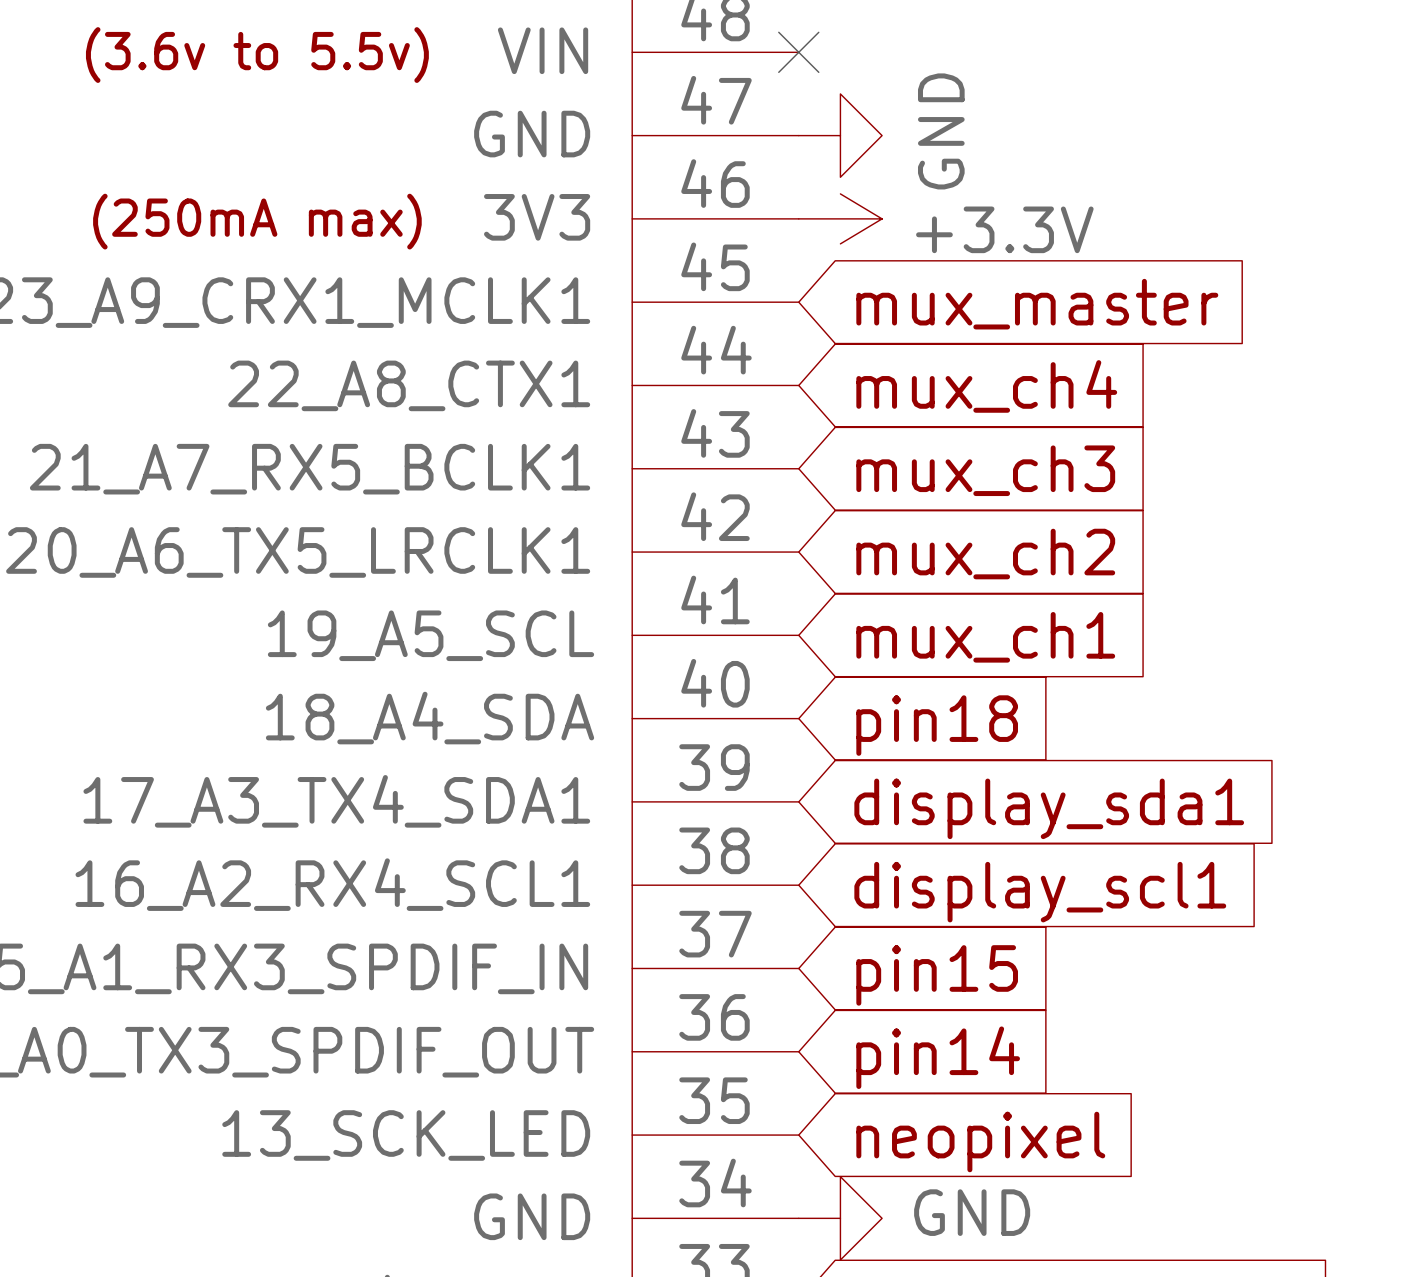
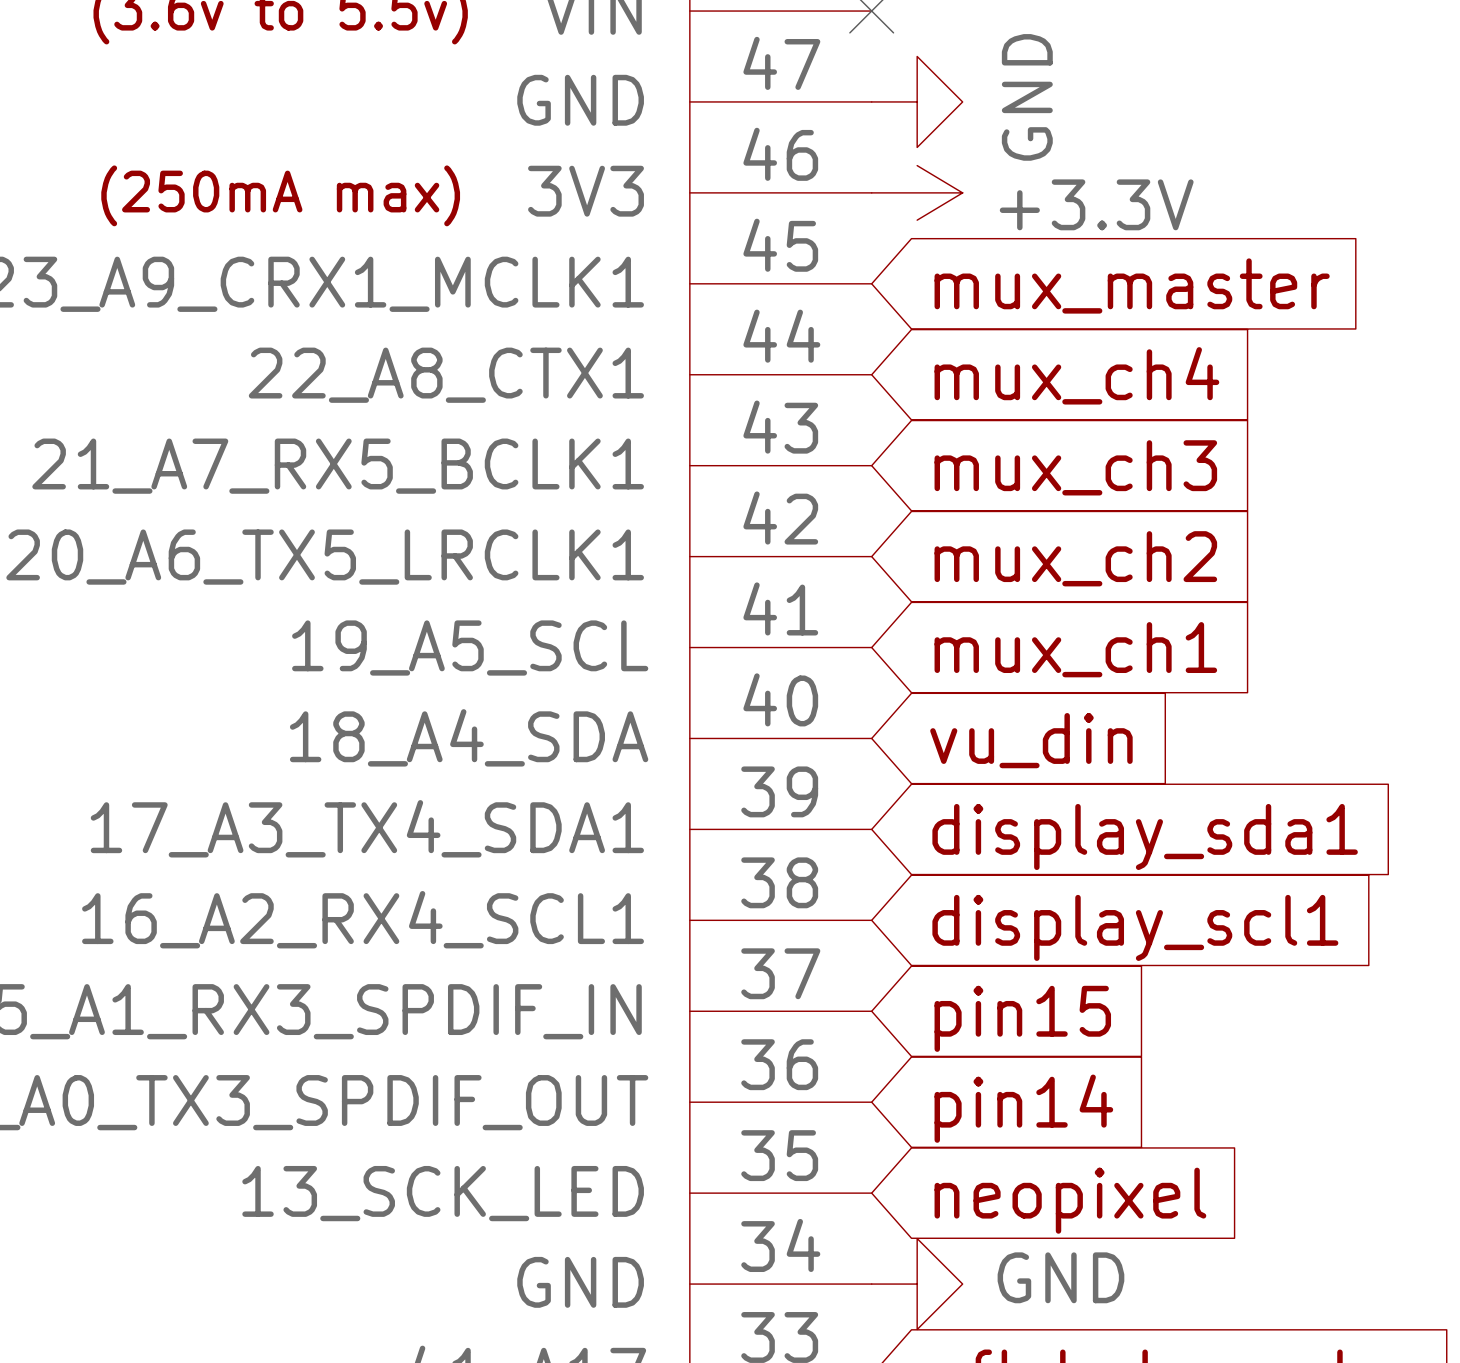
global label: pin18 (937, 725) -> vu_din (1031, 740)

